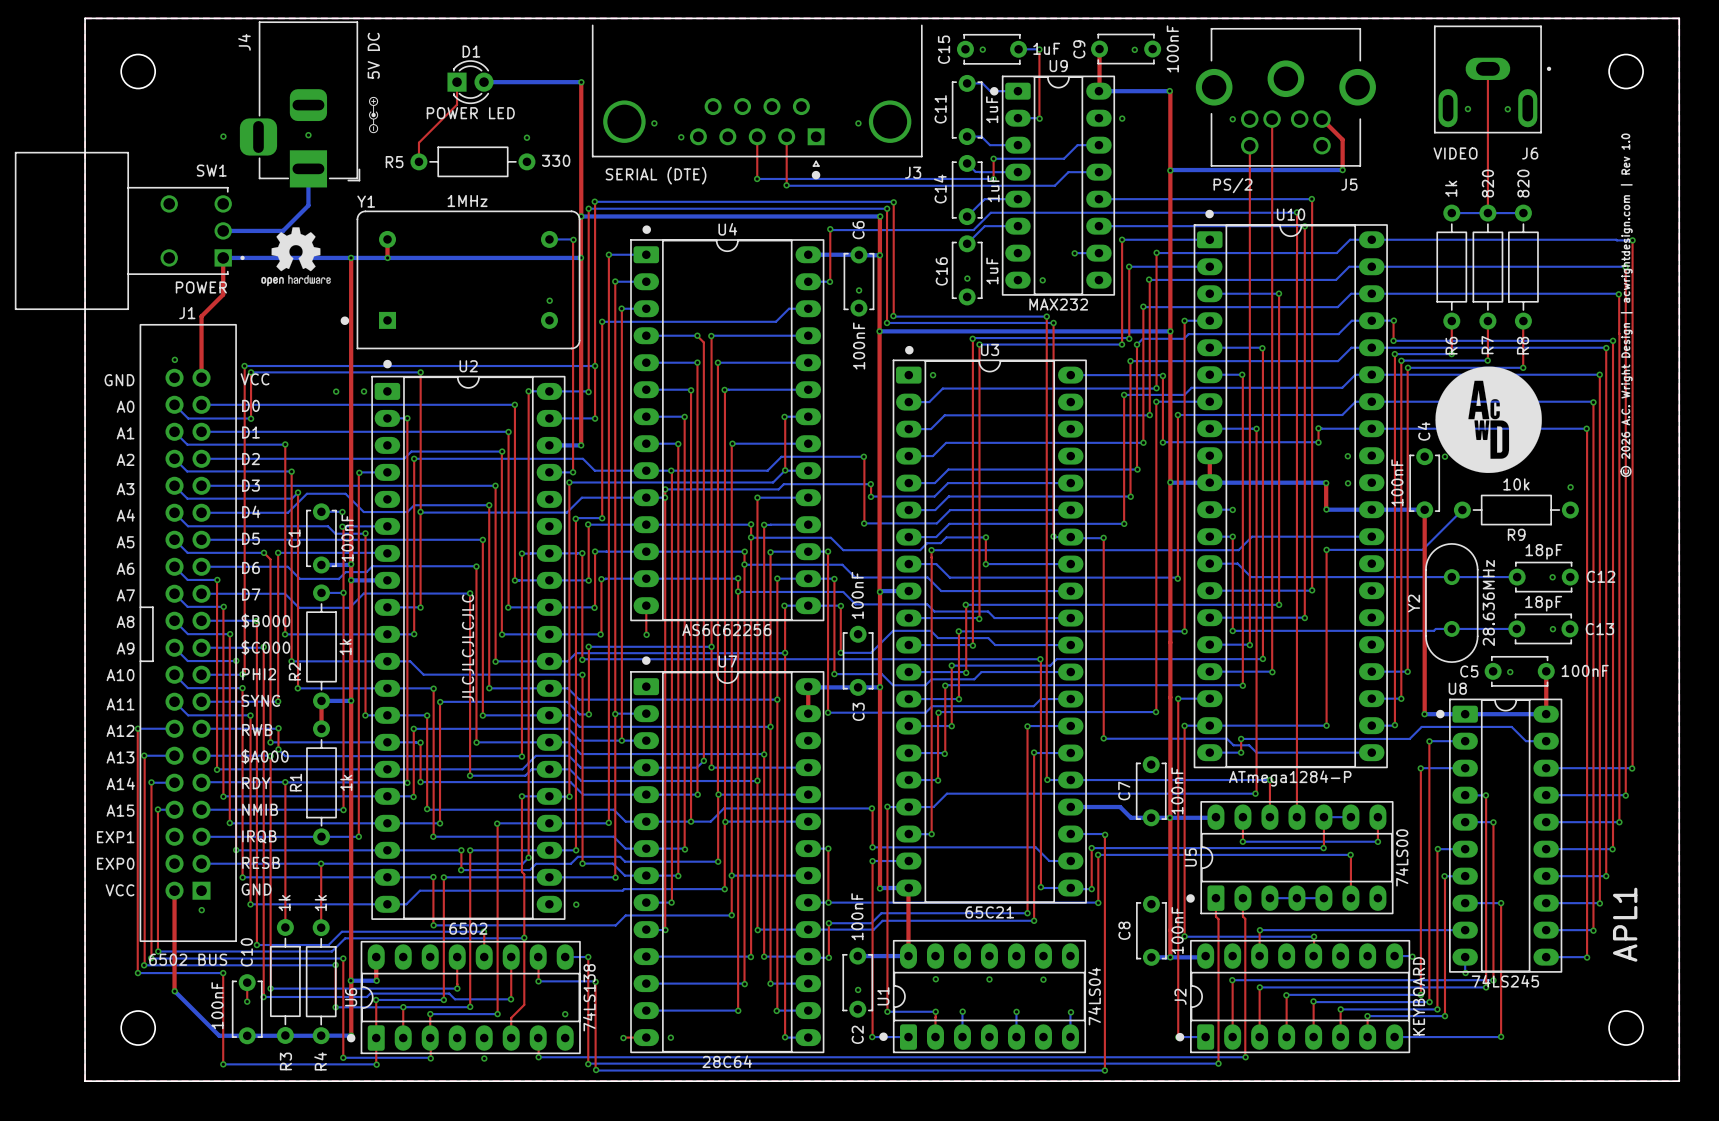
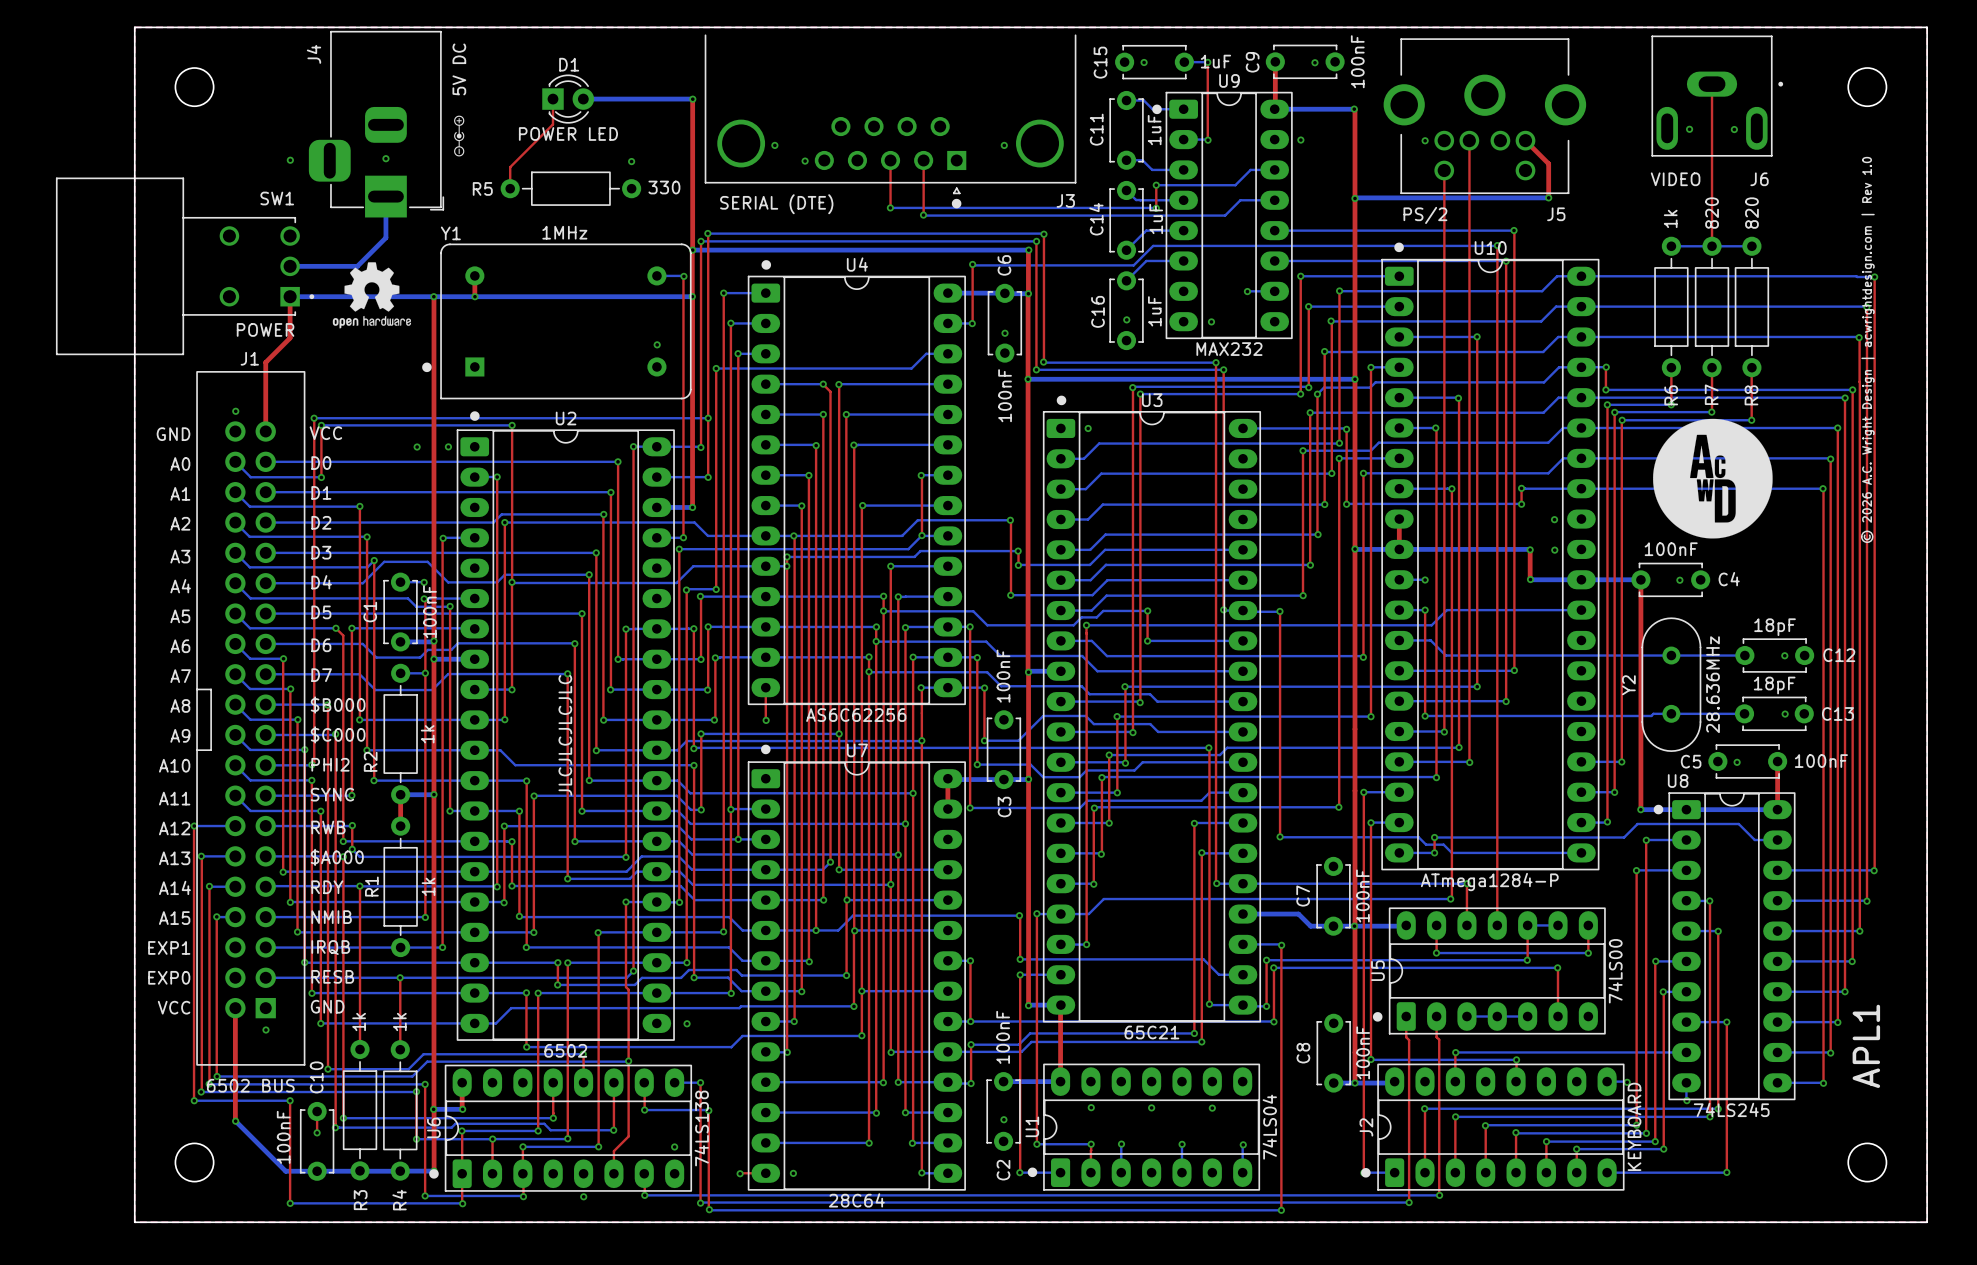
via position: (1444, 456) -> (1679, 580)
C4 rotation: 0° (1424, 483) -> 90° clockwise (1670, 579)
via: (1570, 487) -> none
bottom track: (1462, 510) (1422, 549) (1326, 549) -> none
R9: 10k (1516, 510) -> none
top track: (1326, 549) (1326, 725) -> none
via: (1326, 549) -> none
bottom track: (1209, 725) (1326, 725) -> none
via: (1326, 725) -> none

